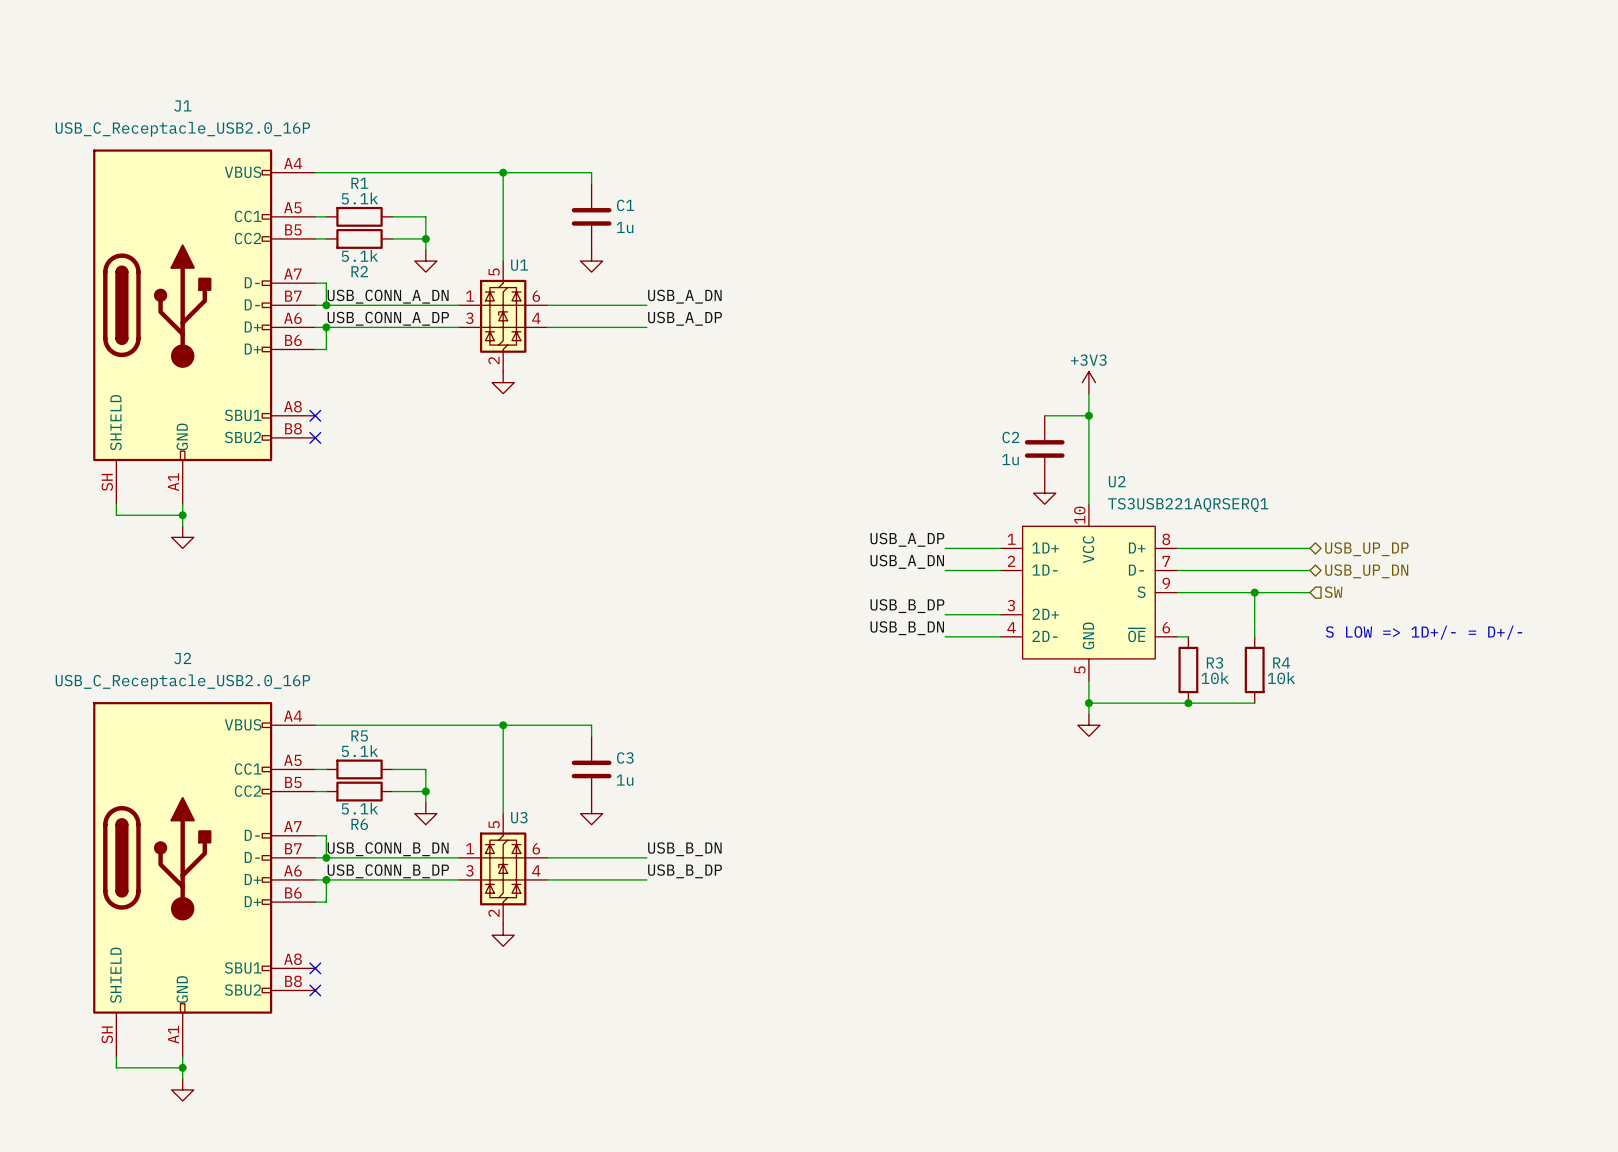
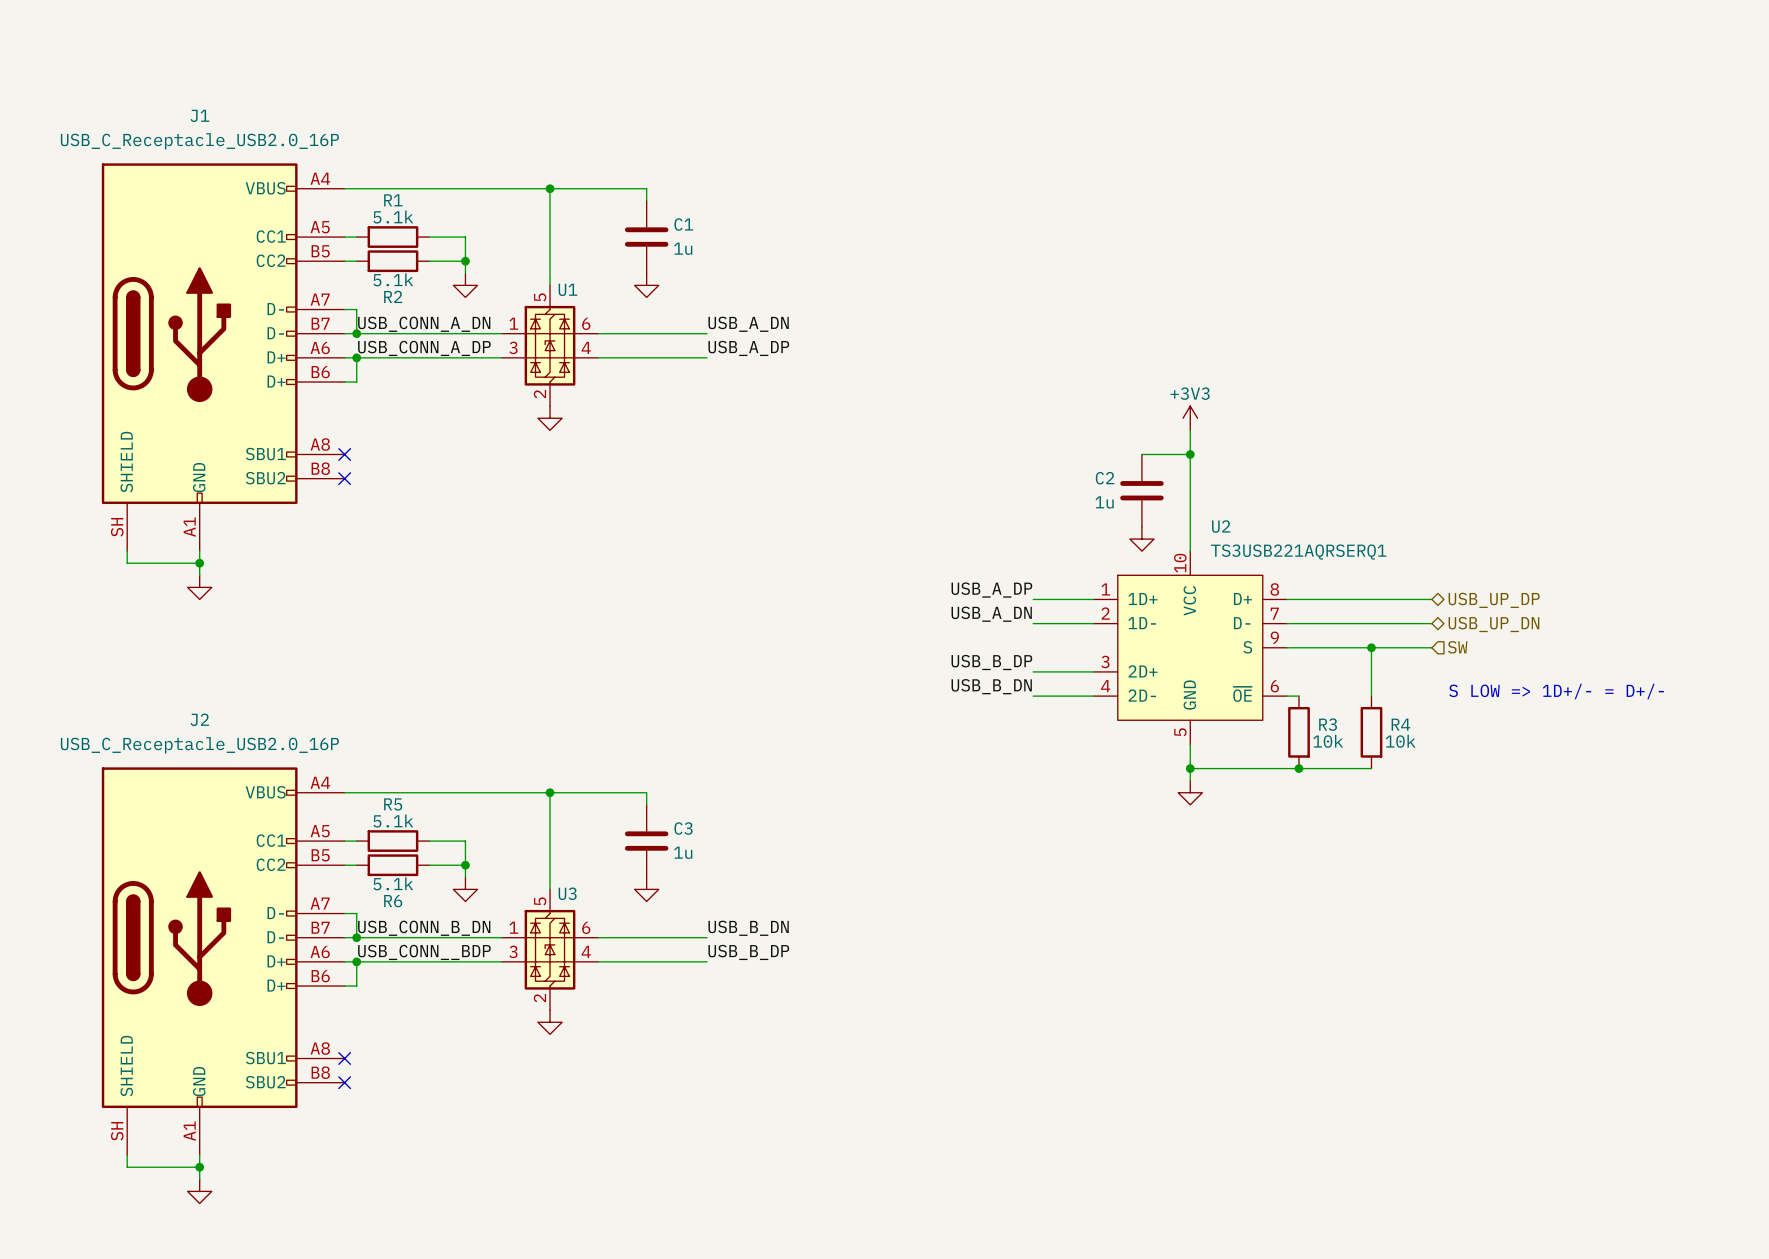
label: USB_CONN_B_DP (388, 871) -> USB_CONN__BDP (424, 952)

